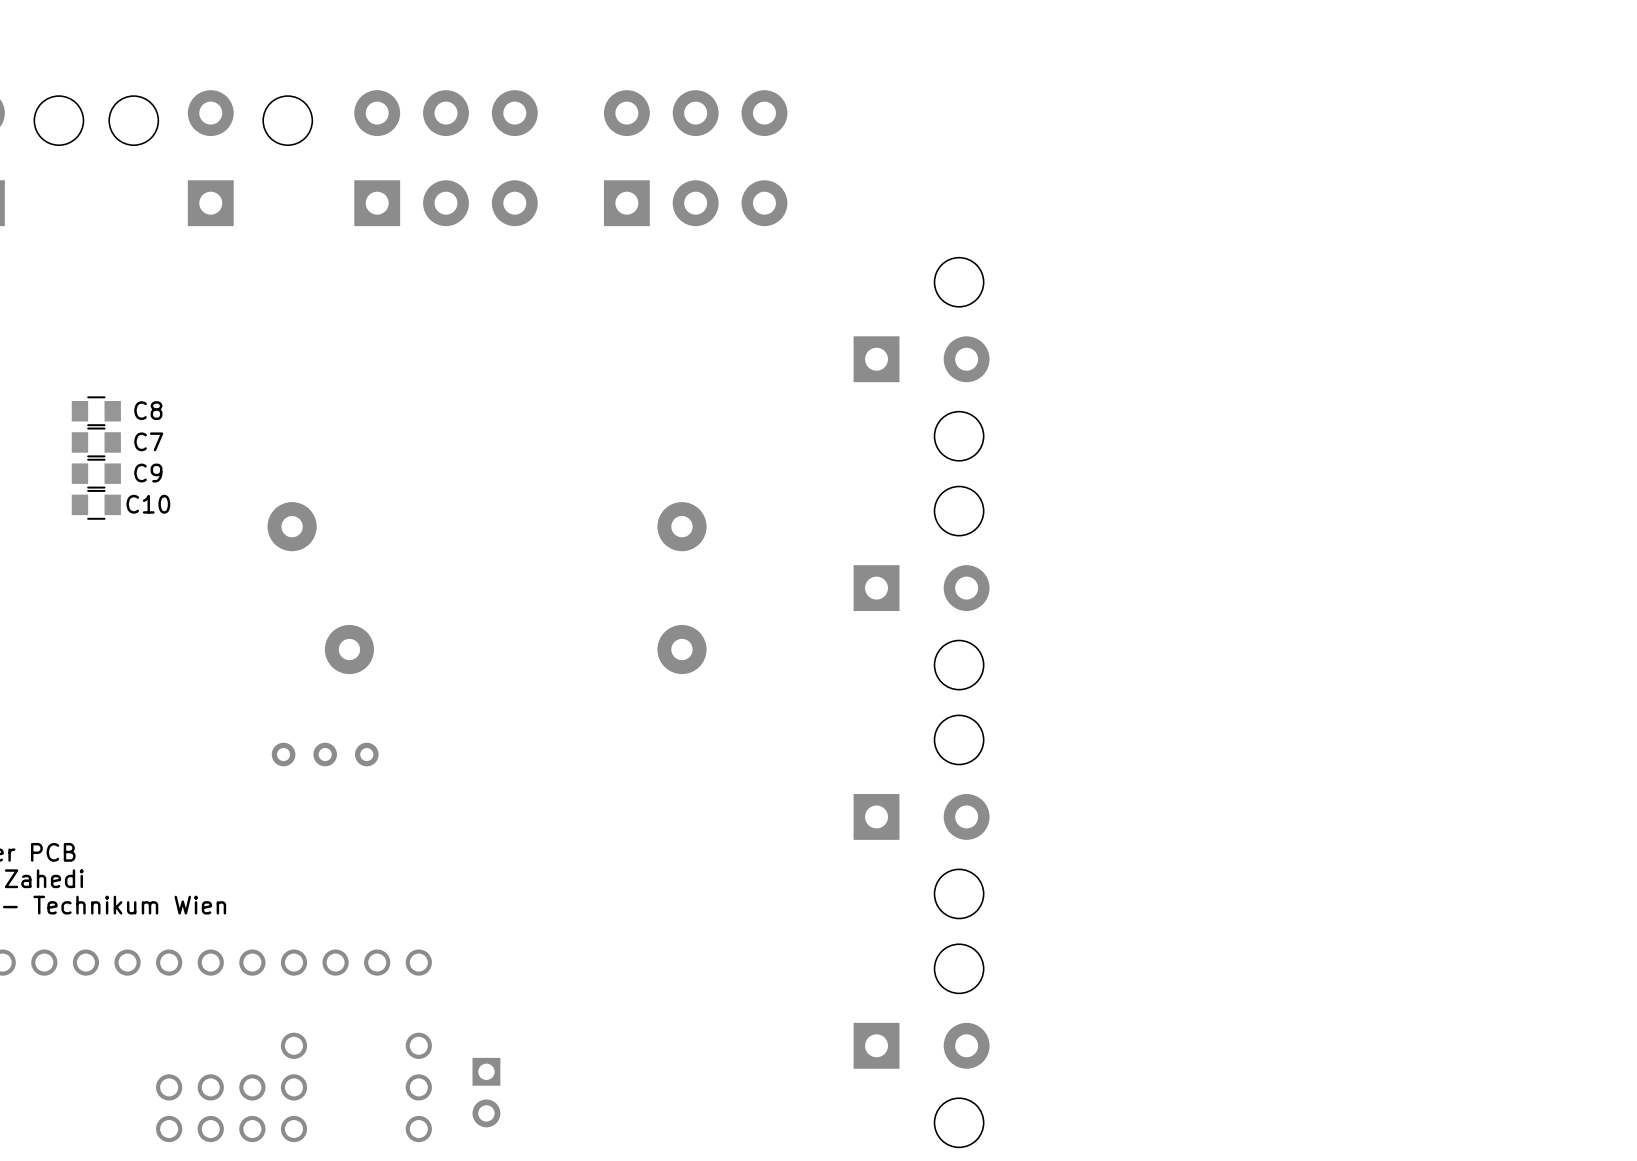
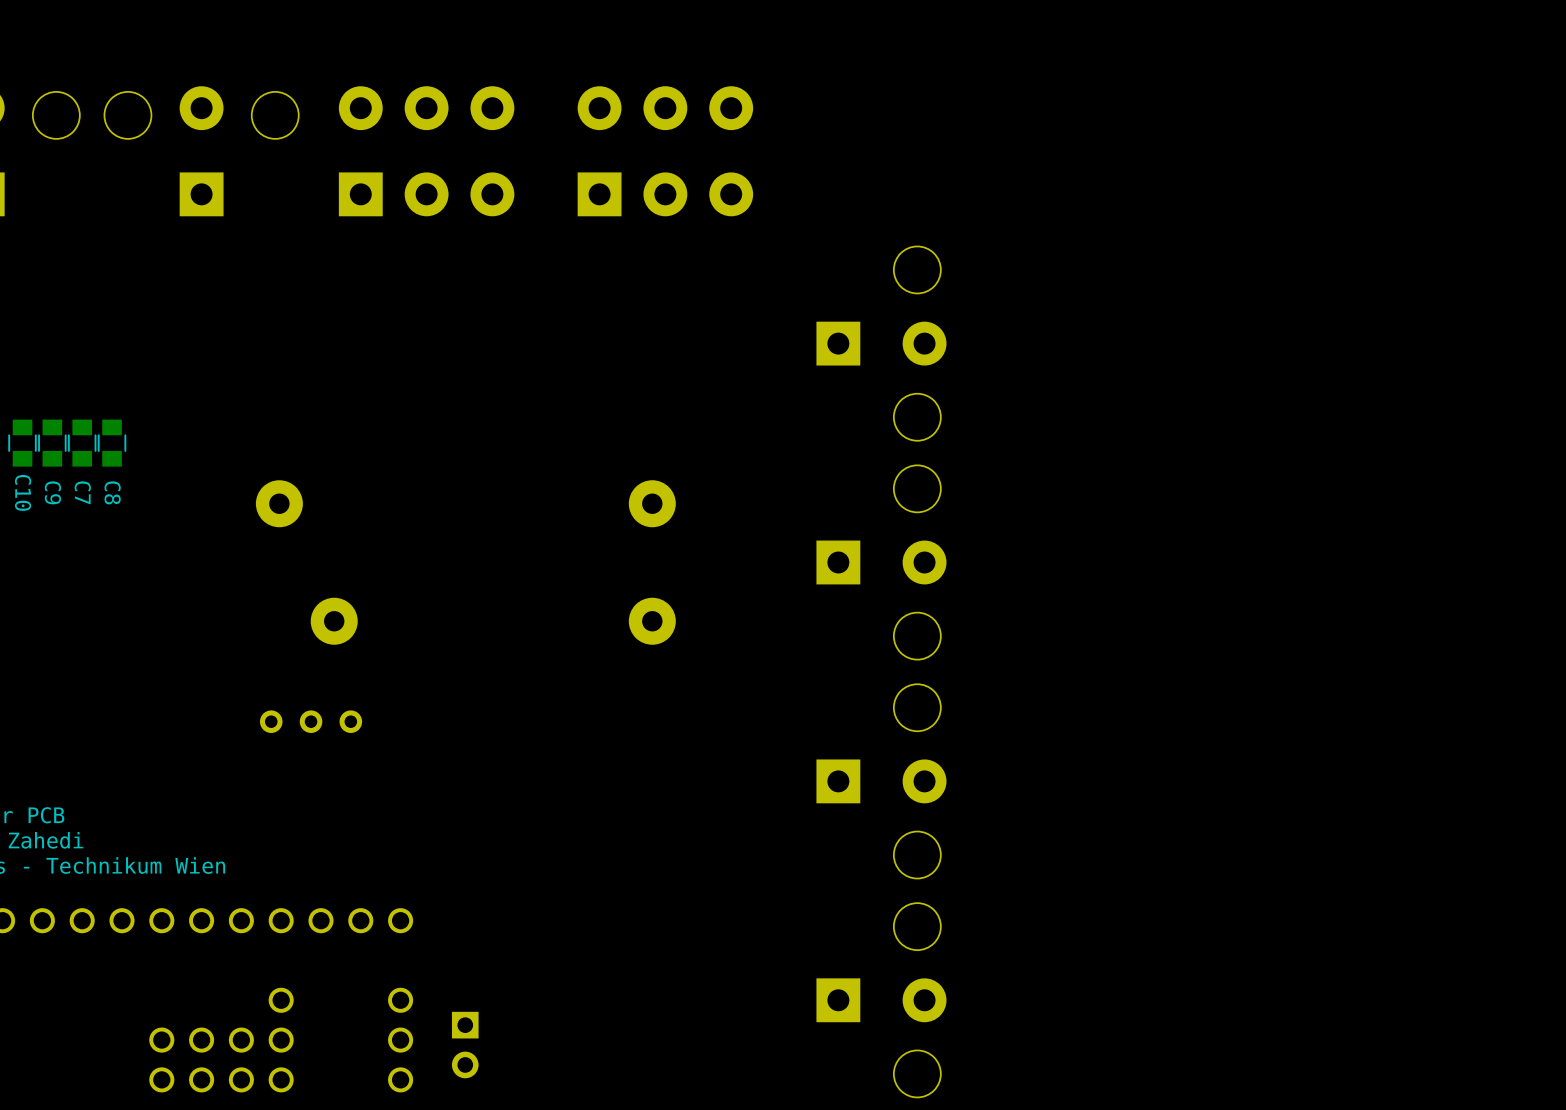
C8 rotation: 0° (96, 411) -> 90° clockwise (112, 443)
C8 position: (96, 411) -> (112, 443)
C7 rotation: 0° (96, 442) -> 90° clockwise (82, 443)
C9 rotation: 0° (96, 473) -> 90° clockwise (52, 443)
C9 position: (96, 473) -> (52, 443)
C10 rotation: 0° (96, 504) -> 90° clockwise (22, 443)
C10 position: (96, 504) -> (22, 443)

